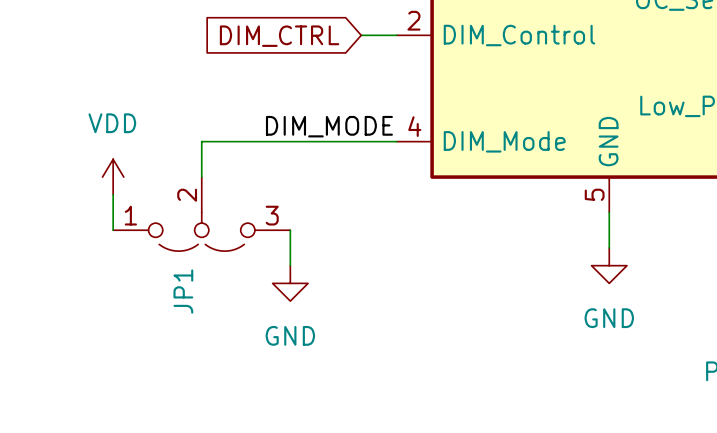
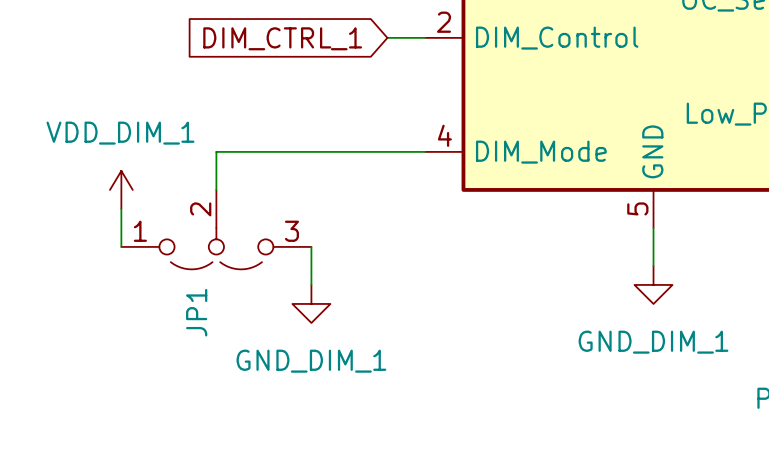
global label: DIM_CTRL (279, 36) -> DIM_CTRL_1 (282, 38)
label: DIM_MODE (329, 126) -> none
power symbol: VDD (113, 177) -> VDD_DIM_1 (121, 189)
power symbol: GND (609, 265) -> GND_DIM_1 (653, 284)
power symbol: GND (290, 283) -> GND_DIM_1 (311, 303)

